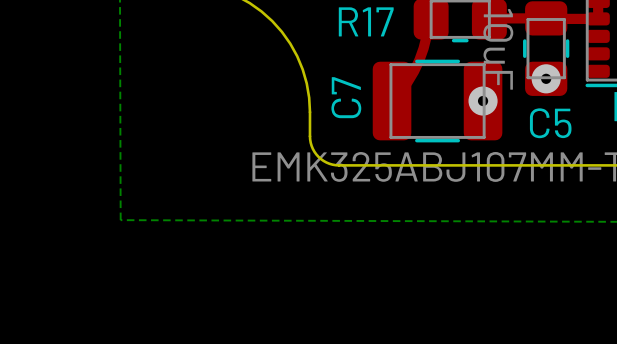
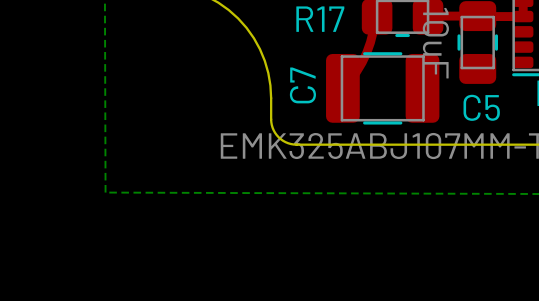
via: (546, 78) -> none
via: (483, 101) -> none

